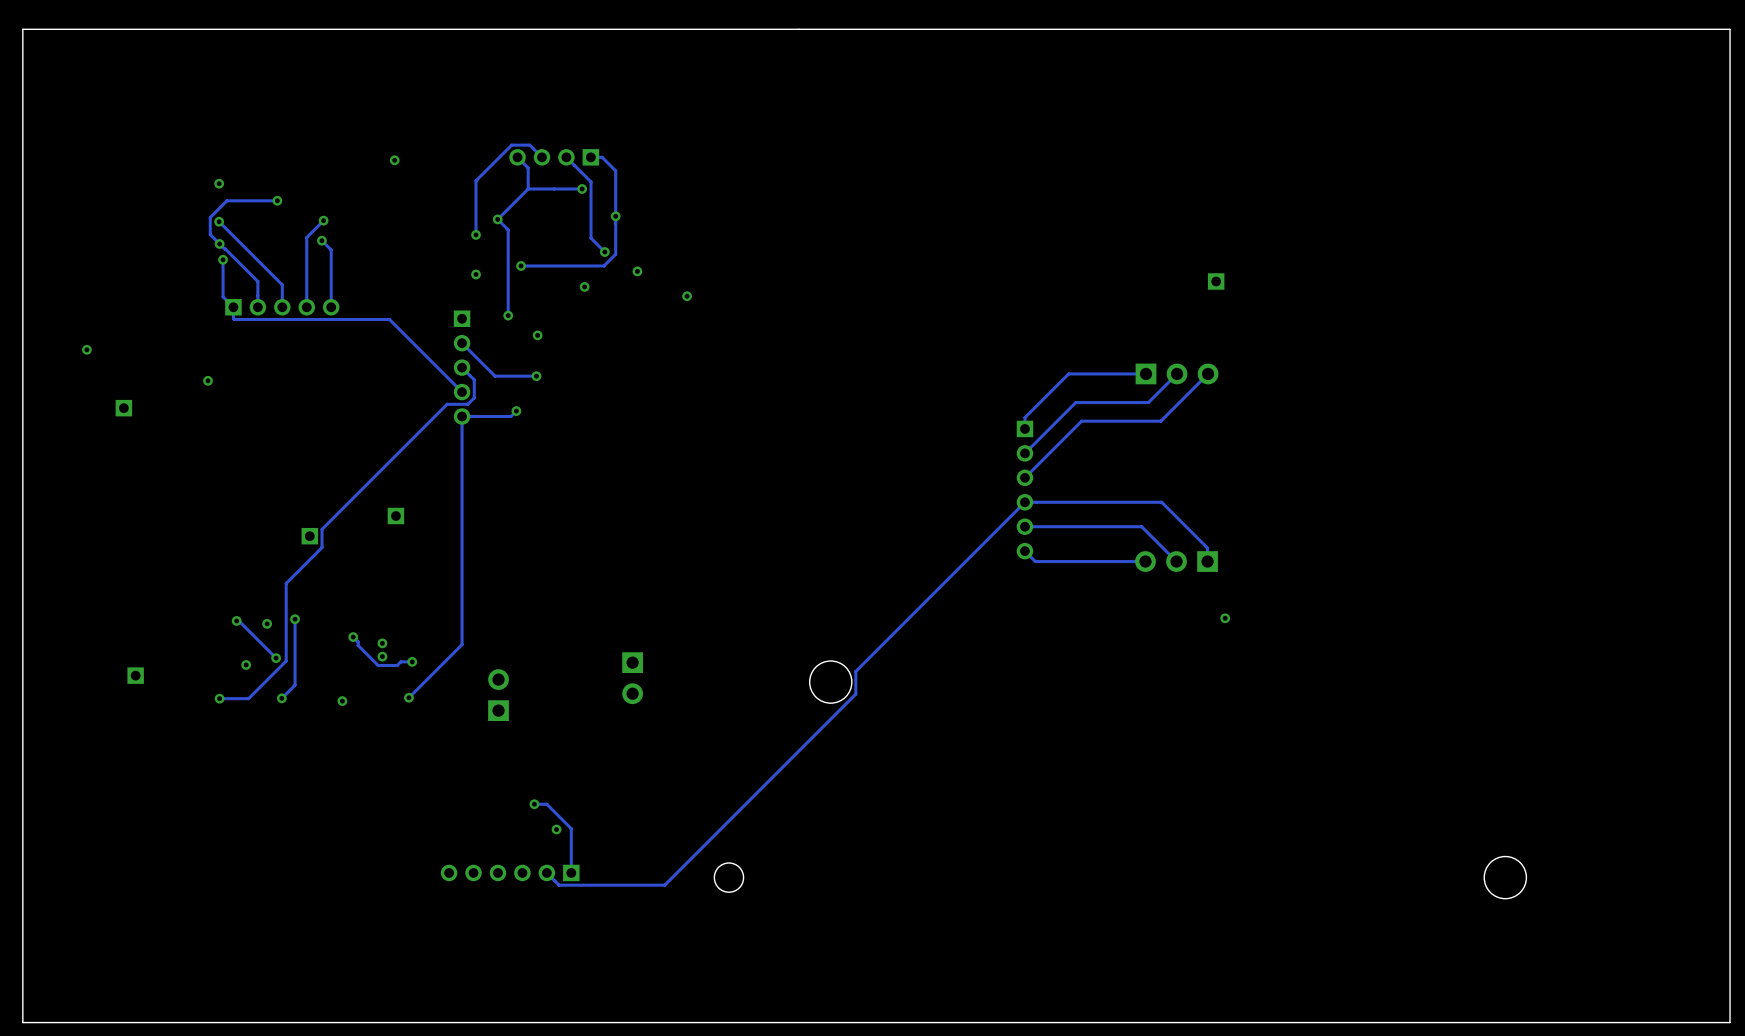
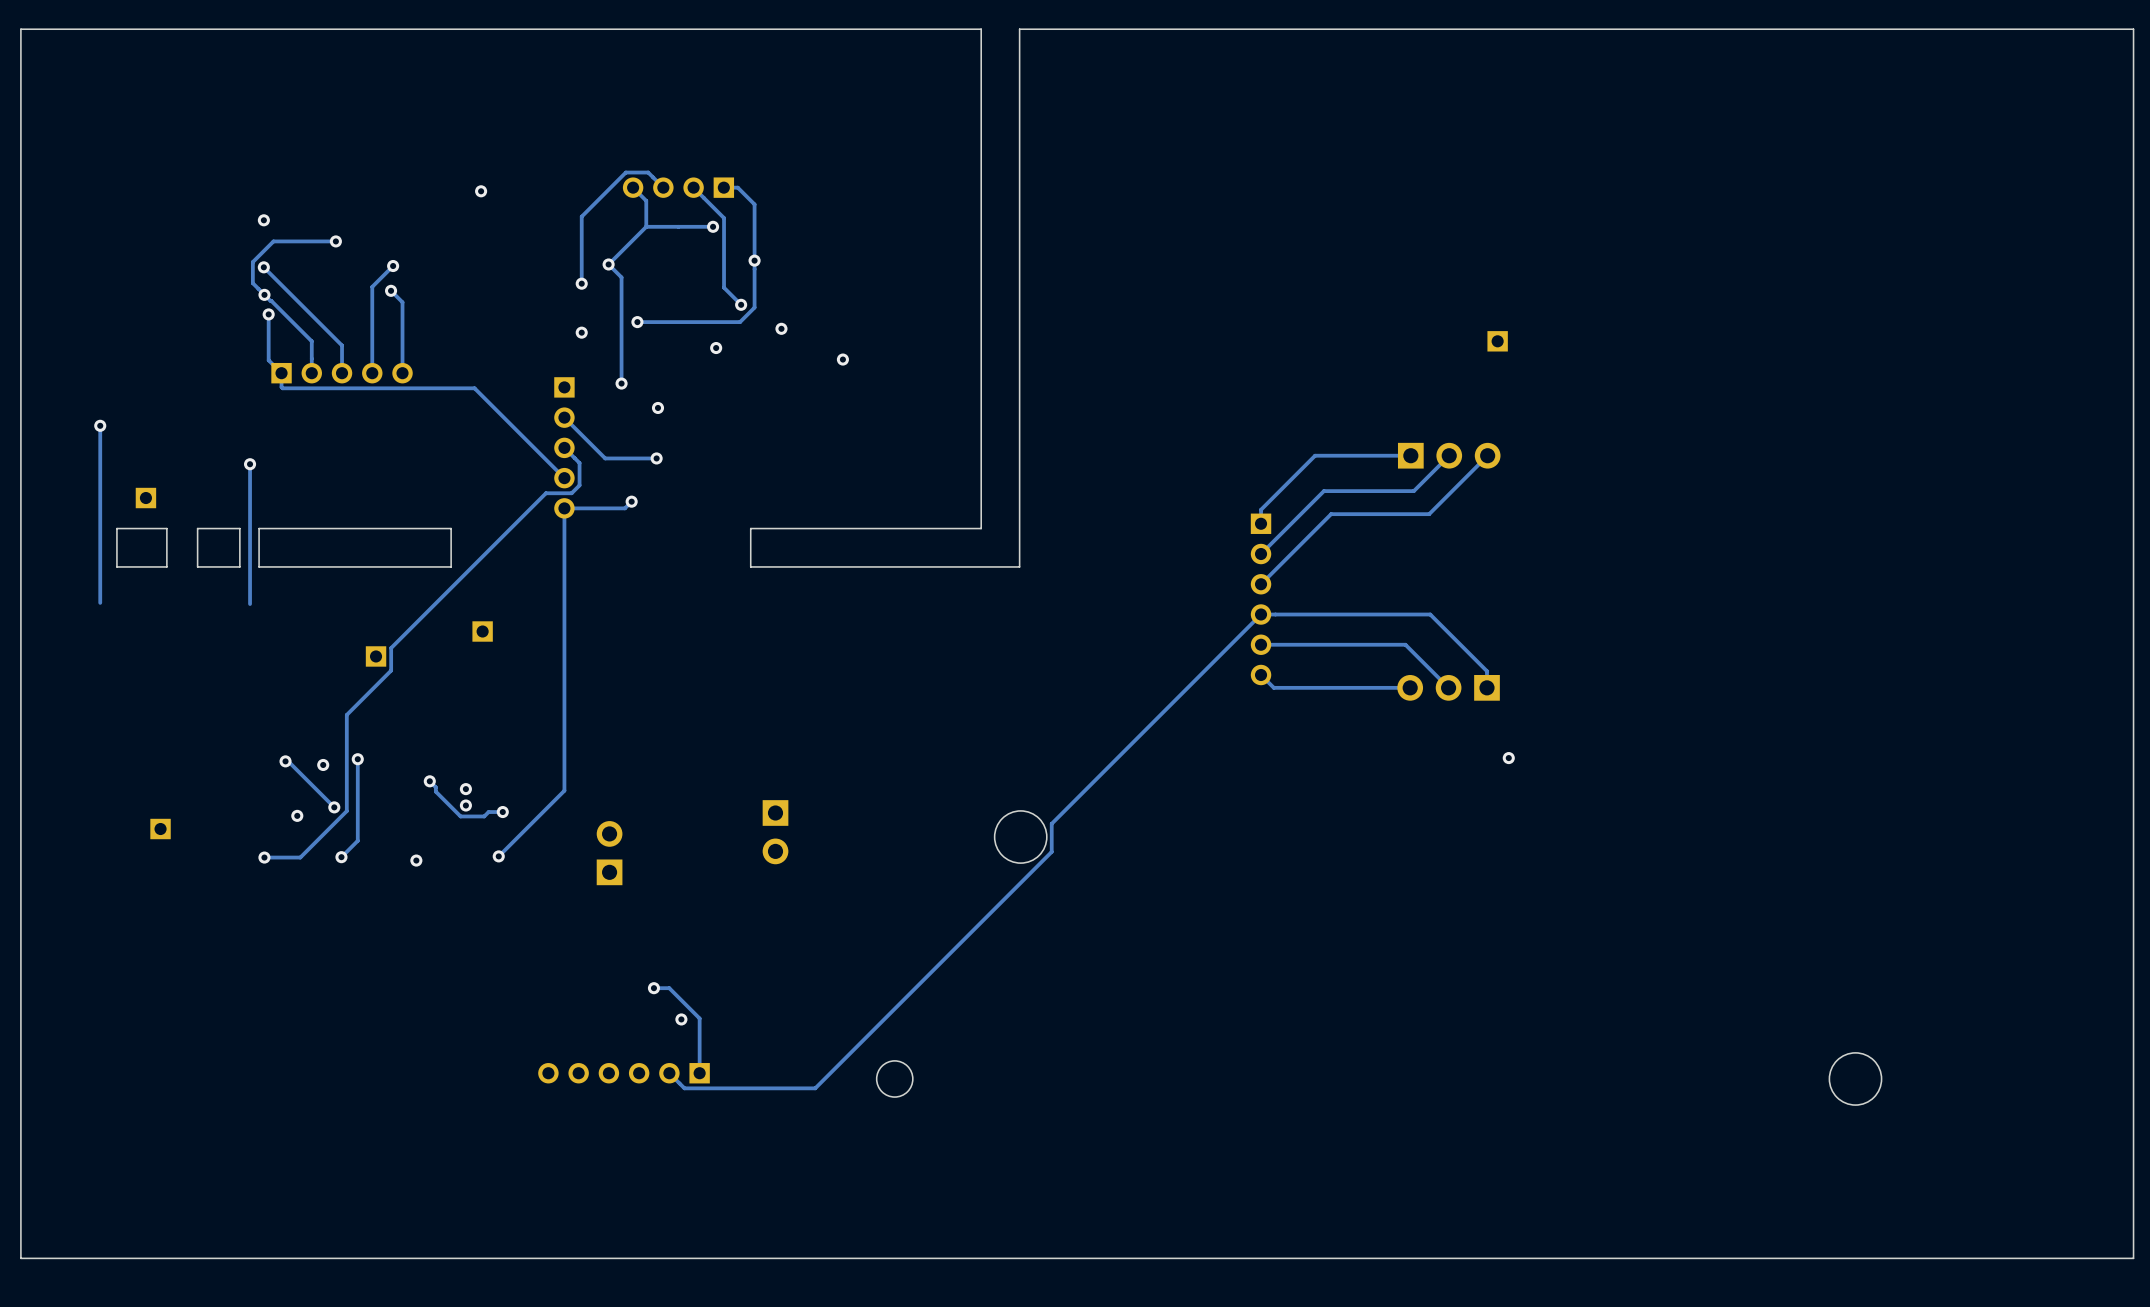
board edge: (829, 29) (798, 29) -> (1019, 29) (1019, 566) (750, 566) (750, 528) (981, 528) (981, 29)
track: none -> (100, 425) (100, 602)
track: none -> (250, 464) (250, 604)
board edge: none -> (166, 528) (116, 528) (116, 566) (166, 566) (166, 528)
board edge: none -> (239, 528) (197, 528) (197, 566) (239, 566) (239, 528)
board edge: none -> (451, 528) (259, 528) (259, 566) (451, 566) (451, 528)

